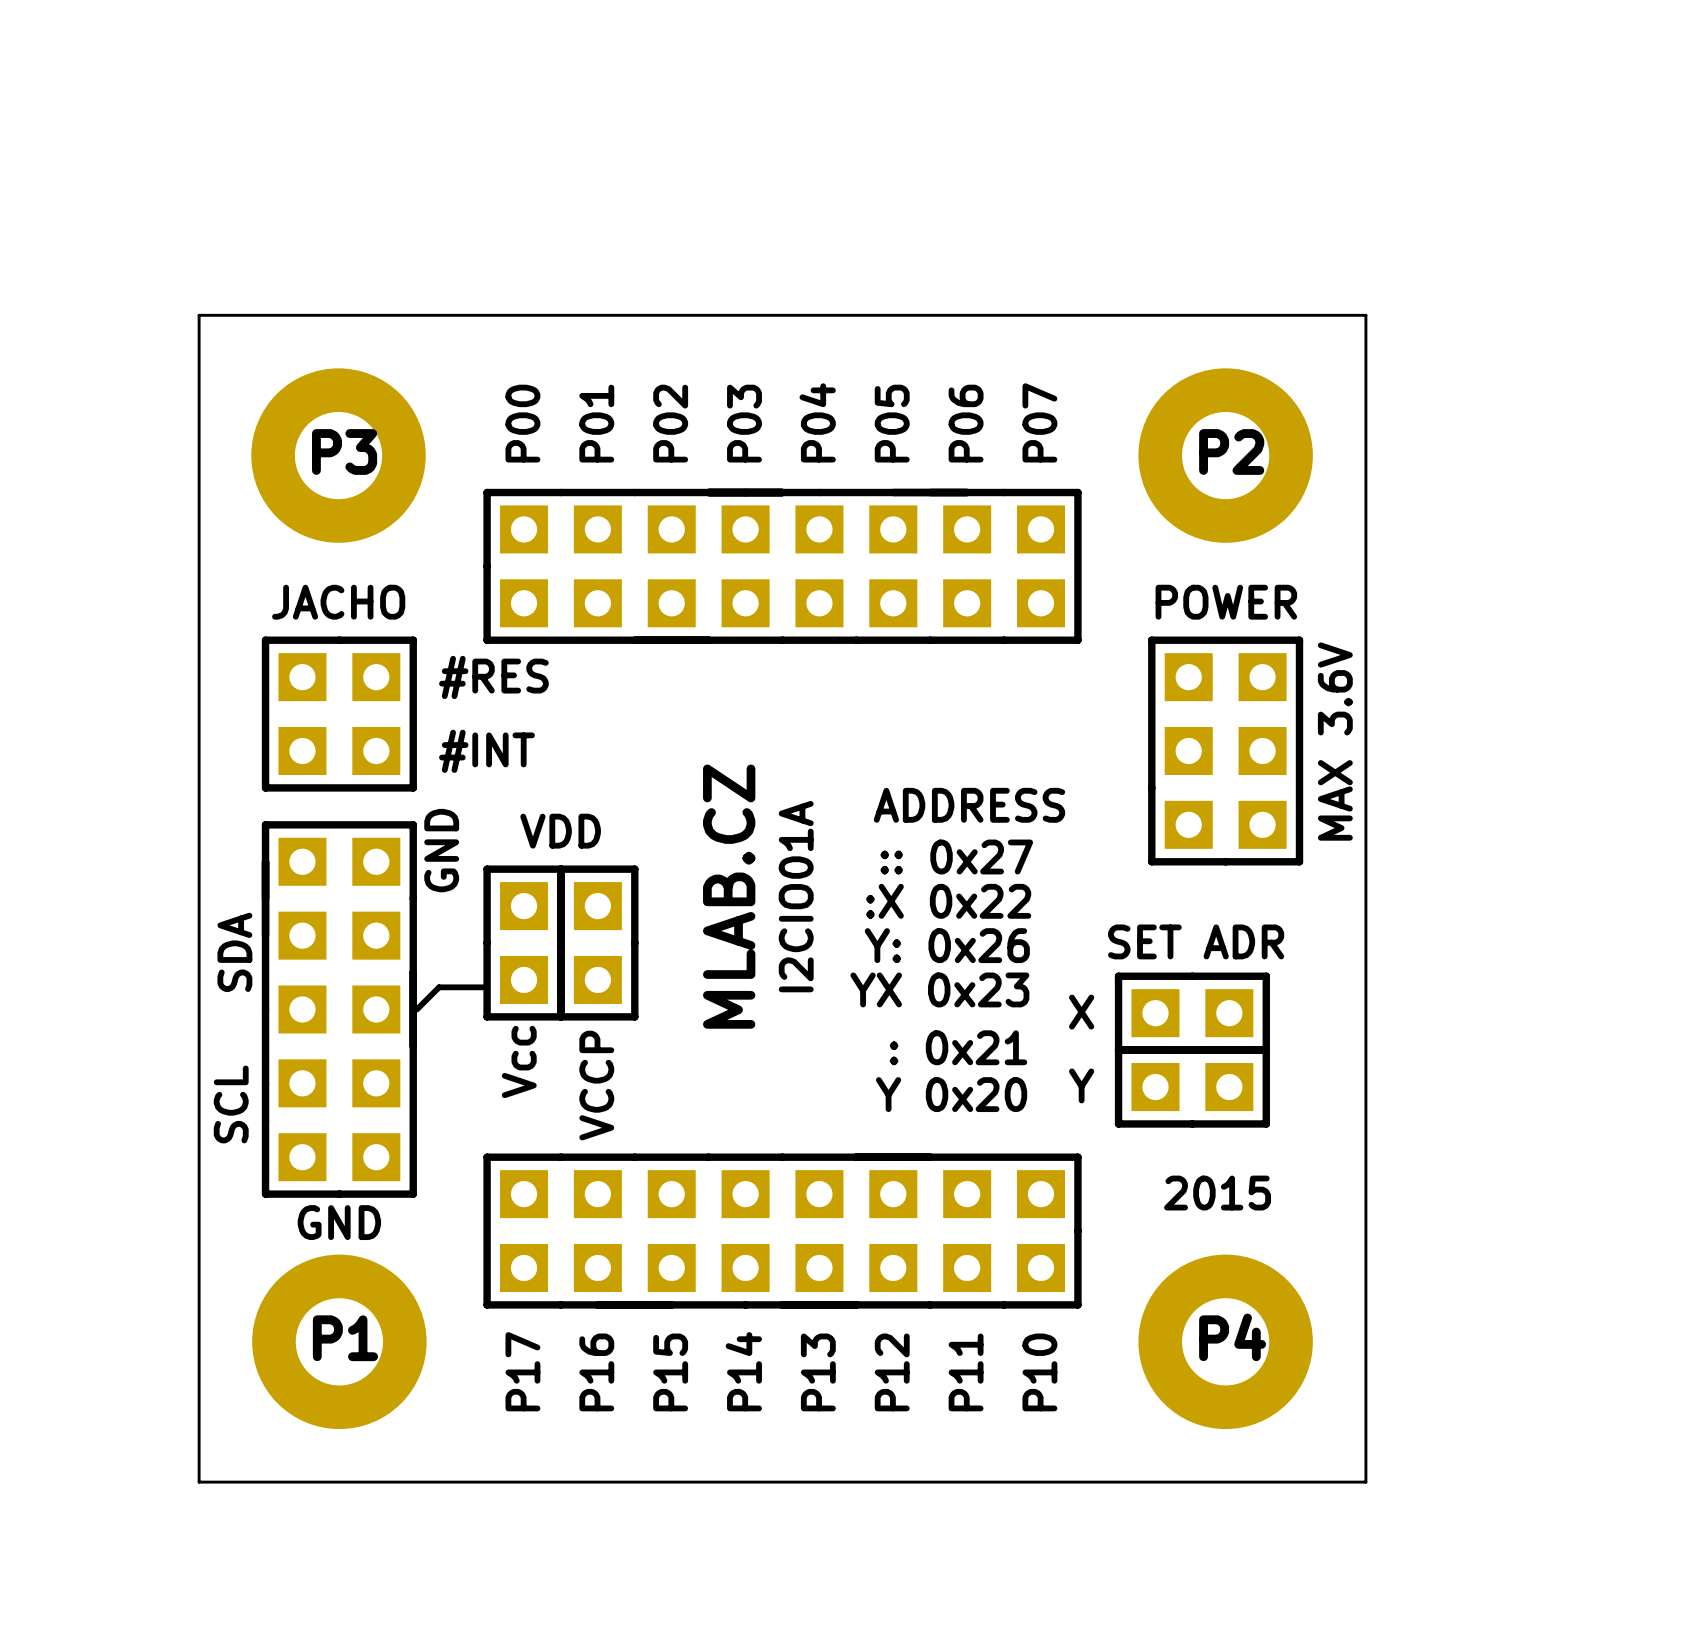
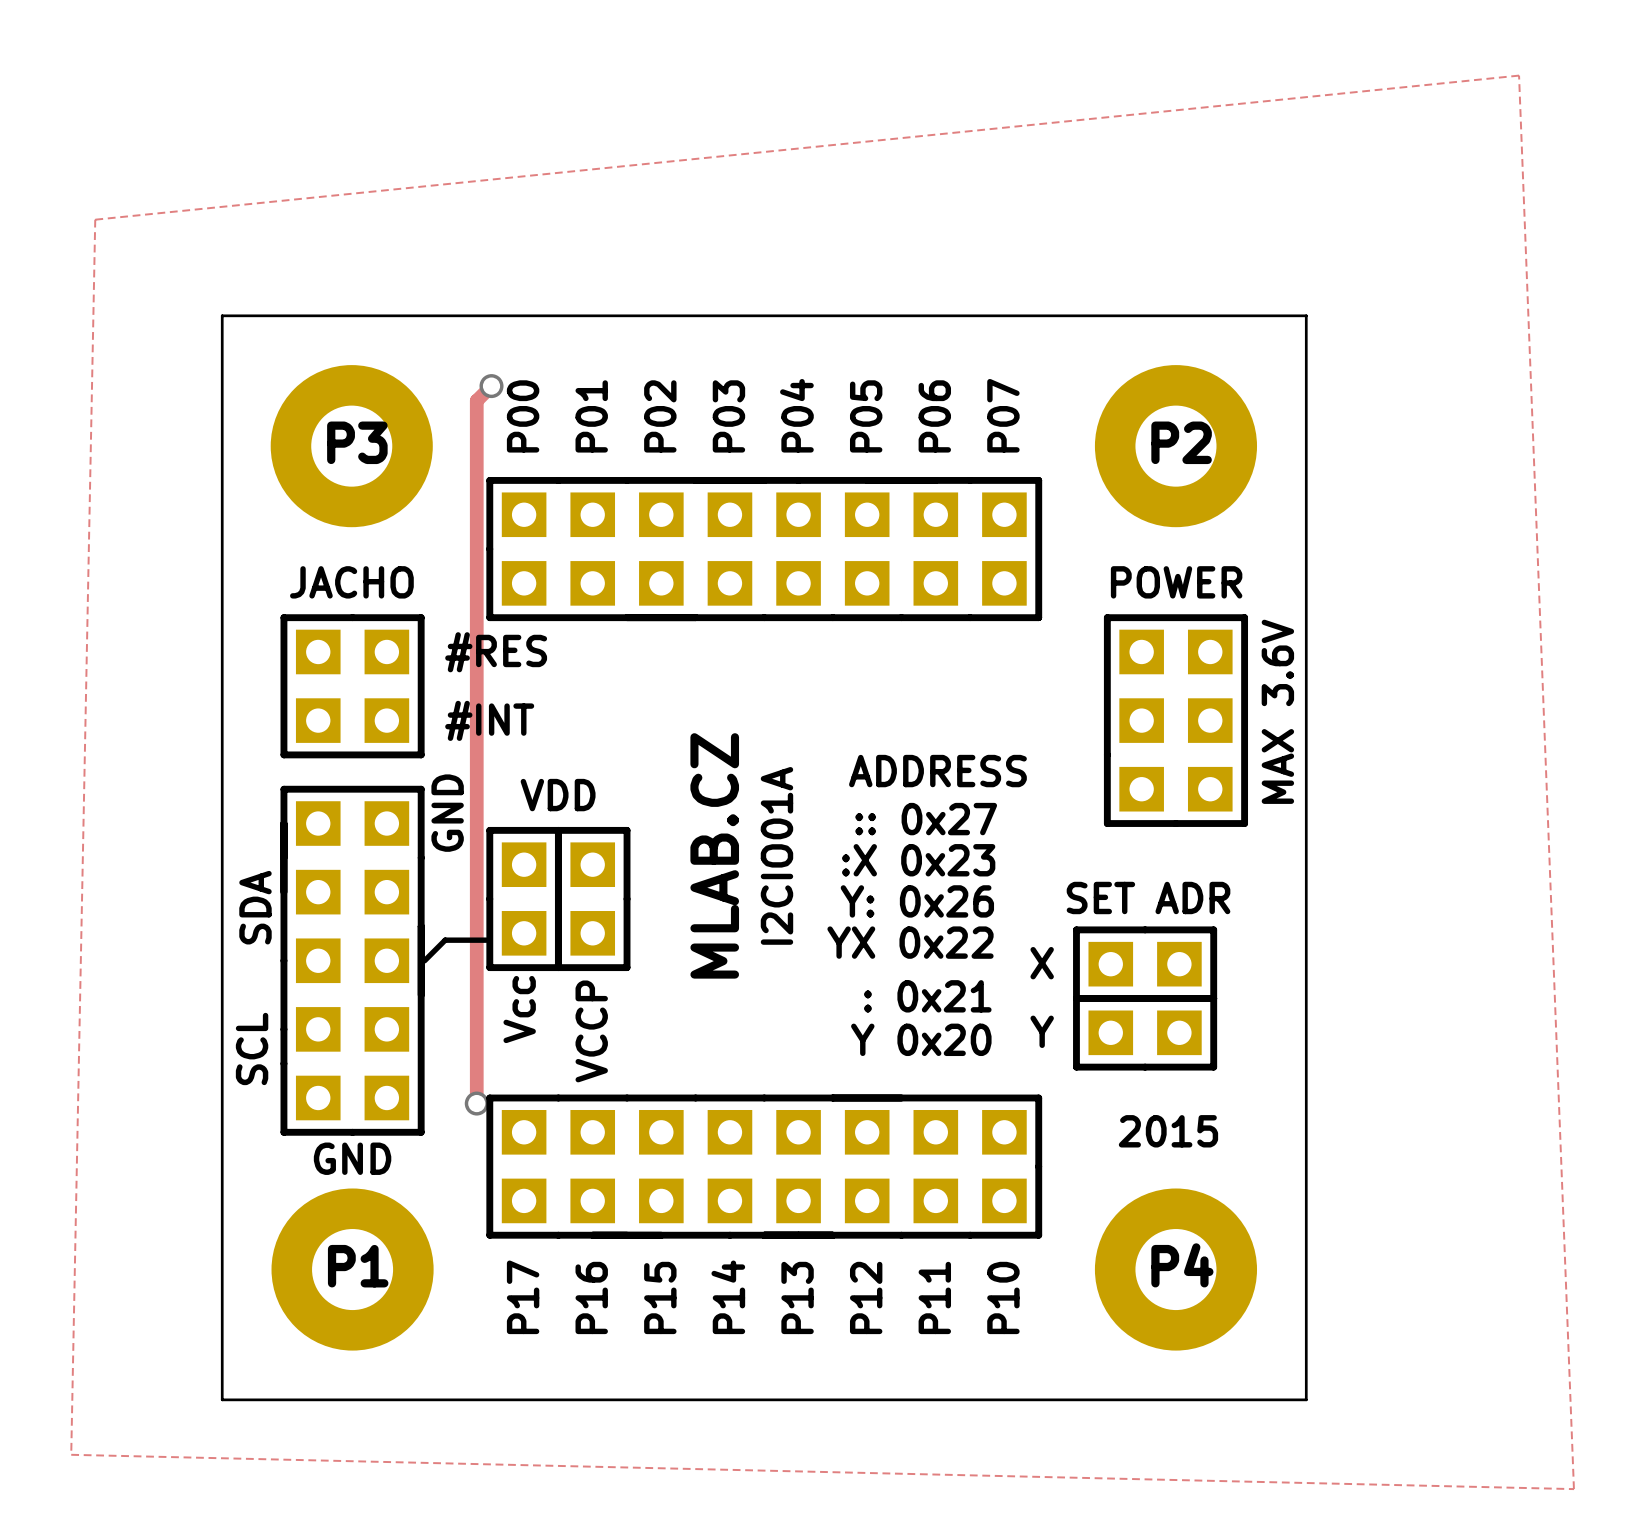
zone outline: none -> (1519, 75) (1573, 1489) (71, 1454) (95, 219) (1519, 75)
track: none -> (491, 386) (476, 400) (476, 1103)
via: none -> (491, 386)
text: :X 0x22 (948, 901) -> :X 0x23 (918, 860)
text: YX 0x23 (939, 989) -> YX 0x22 (910, 942)
via: none -> (476, 1103)

